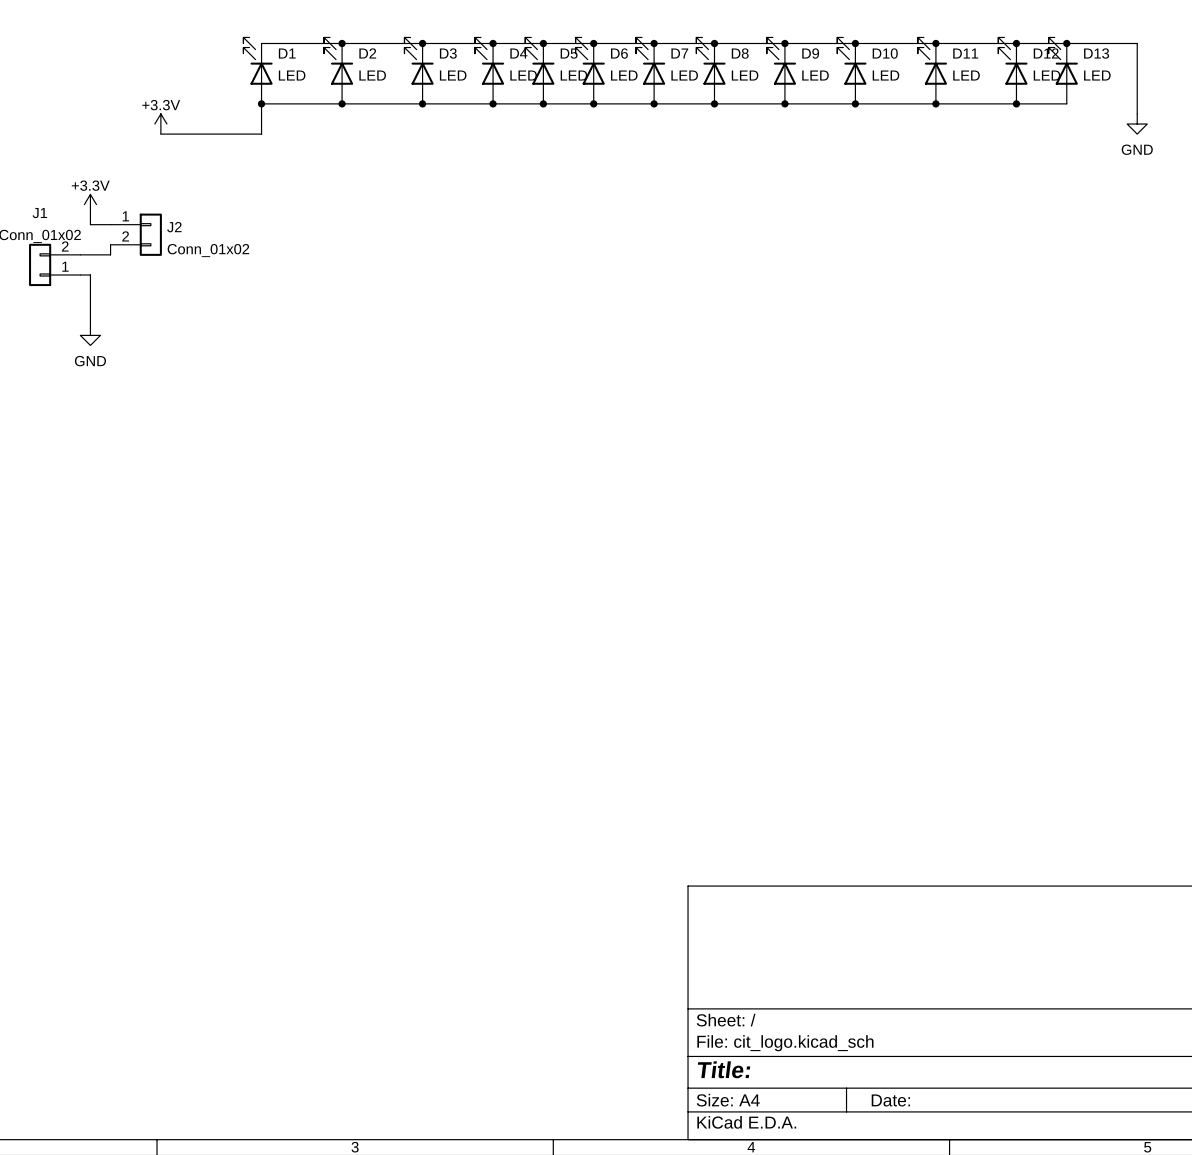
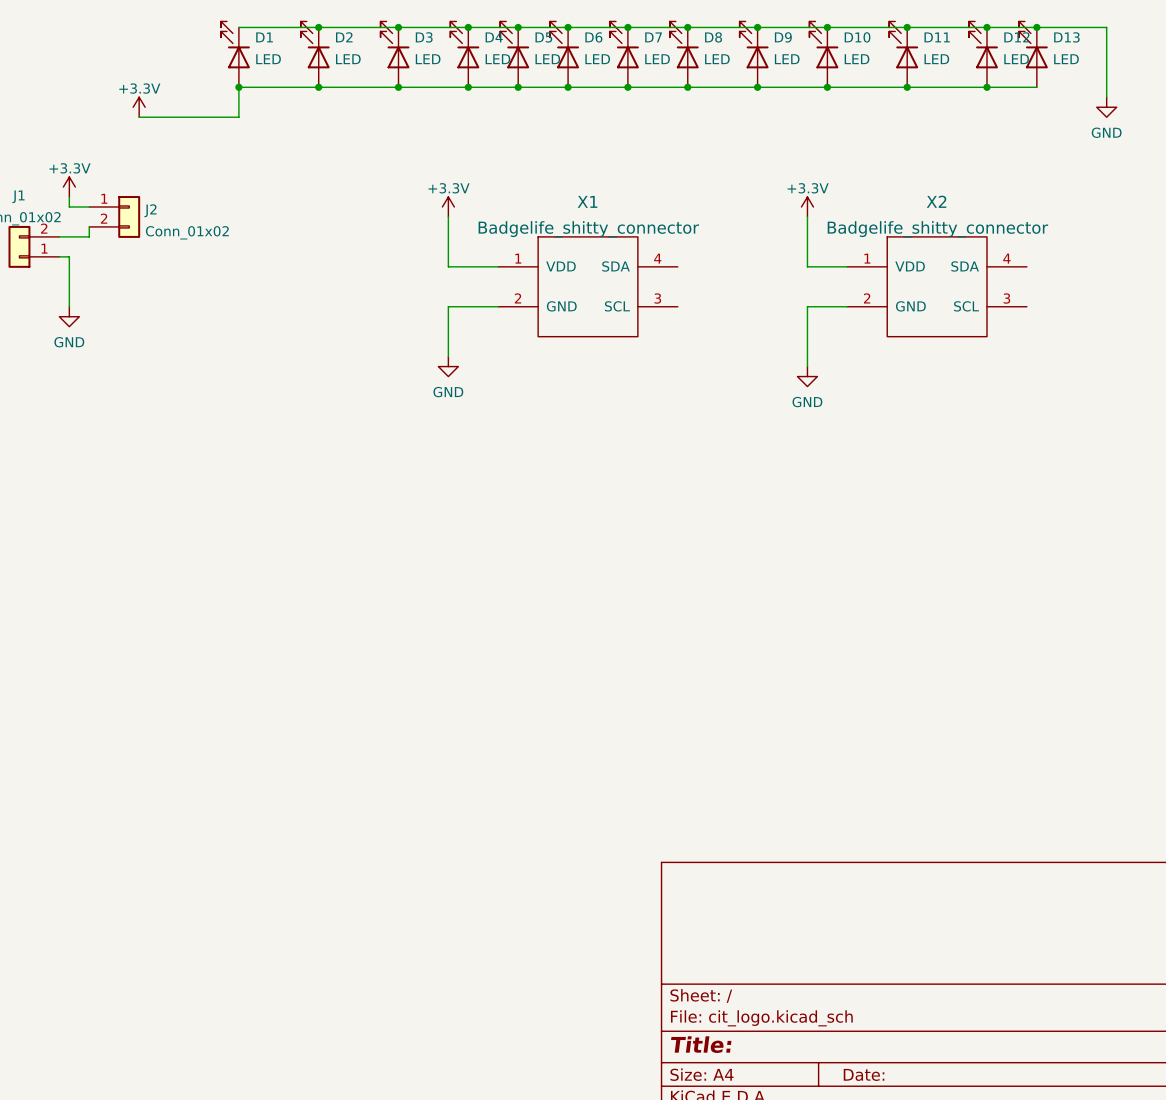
power symbol: none -> +3.3V (448, 207)
power symbol: none -> +3.3V (807, 207)
wire: none -> (448, 216) (448, 266) (498, 266)
wire: none -> (807, 216) (807, 266) (847, 266)
X1: none -> Badgelife_shitty_connector (588, 286)
X2: none -> Badgelife_shitty_connector (937, 286)
wire: none -> (498, 306) (448, 306) (448, 356)
wire: none -> (847, 306) (807, 306) (807, 366)
power symbol: none -> GND (448, 366)
power symbol: none -> GND (807, 376)

